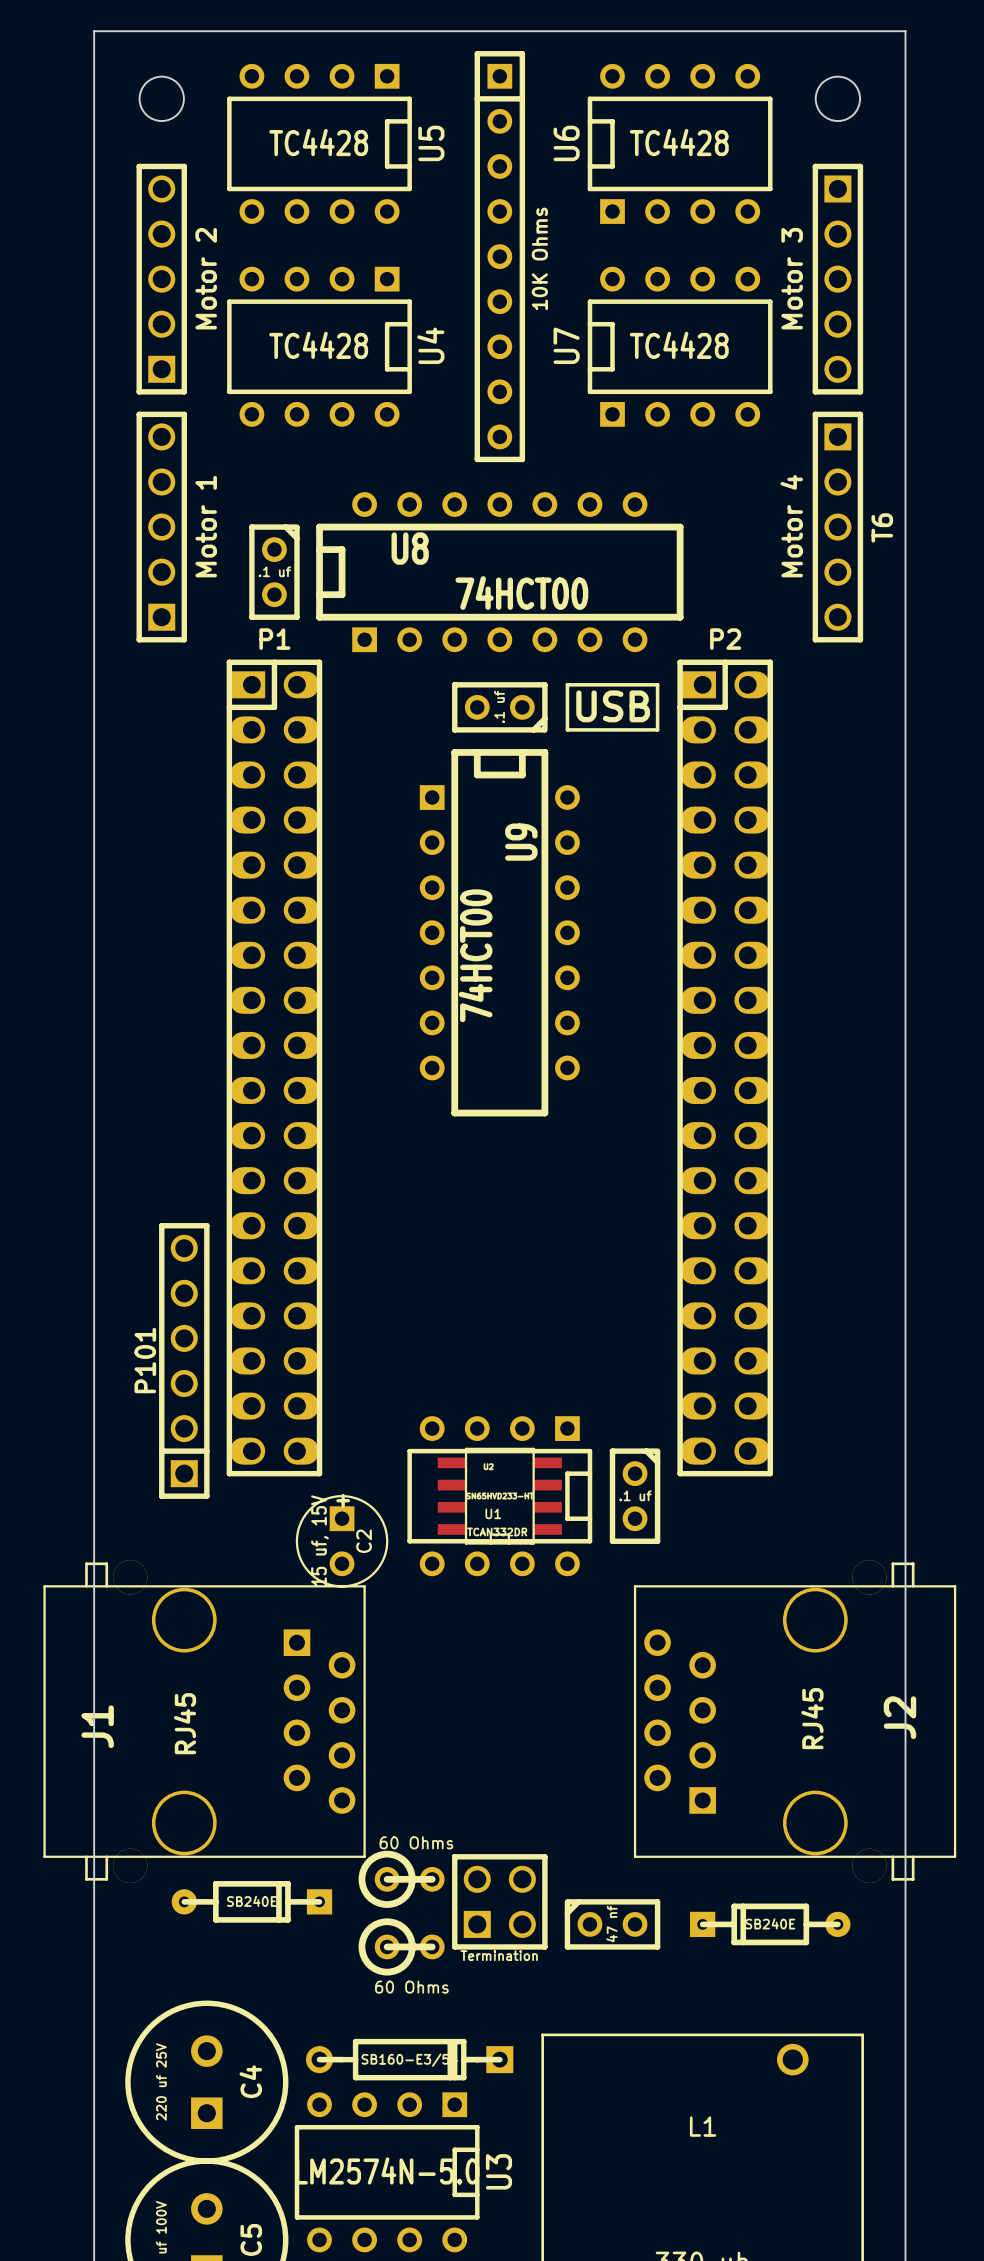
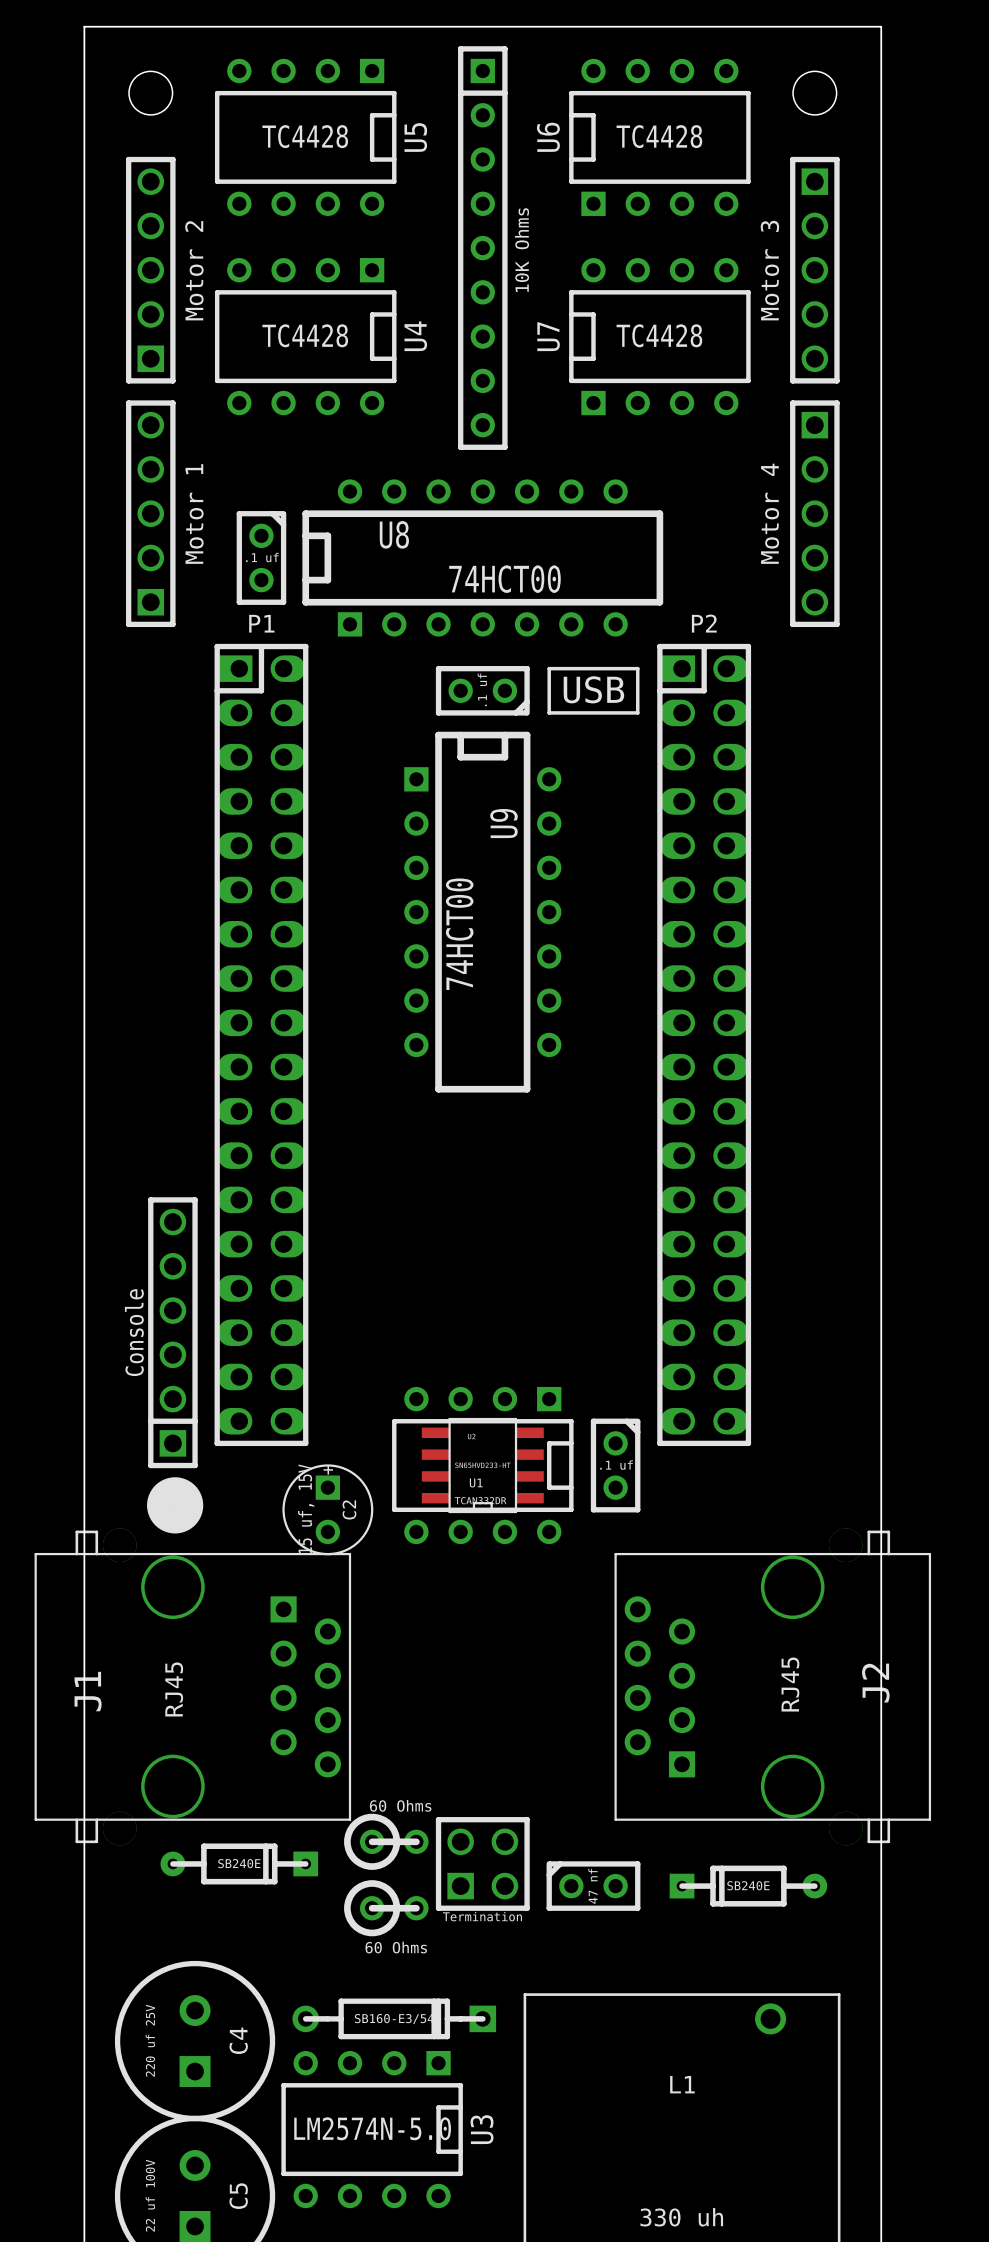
T6 name: T6 (882, 527) -> none
P101 name: P101 (145, 1360) -> none
P101 value: none -> Console (134, 1332)
drawing: none -> [147, 1477, 204, 1534]

